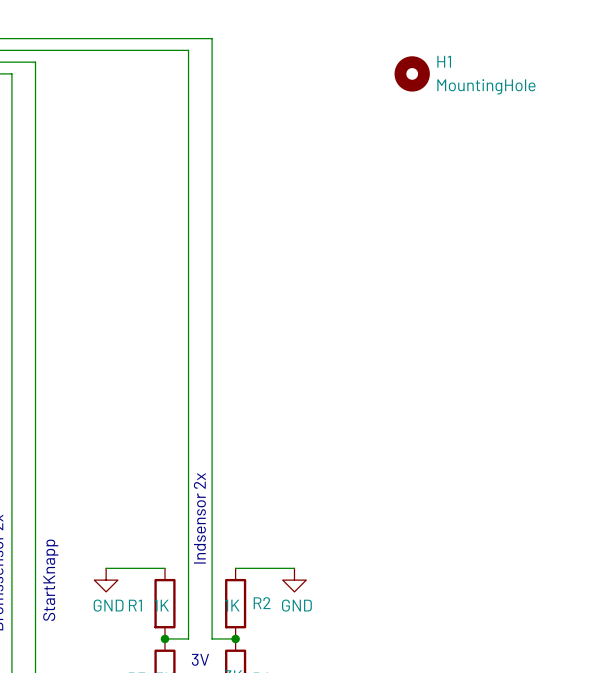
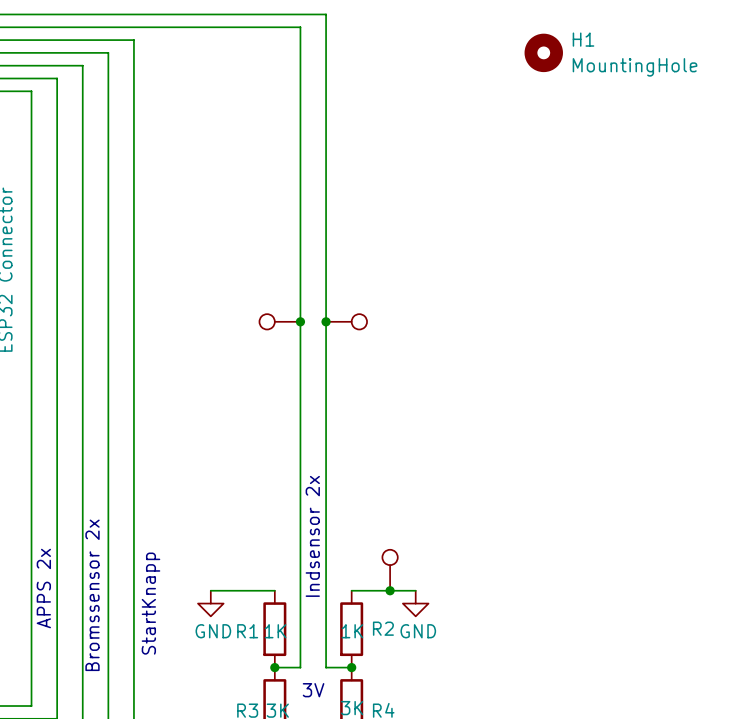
part: none -> (279, 321)
junction: none -> (300, 321)
junction: none -> (326, 321)
part: none -> (346, 321)
part: none -> (390, 570)
junction: none -> (390, 590)

